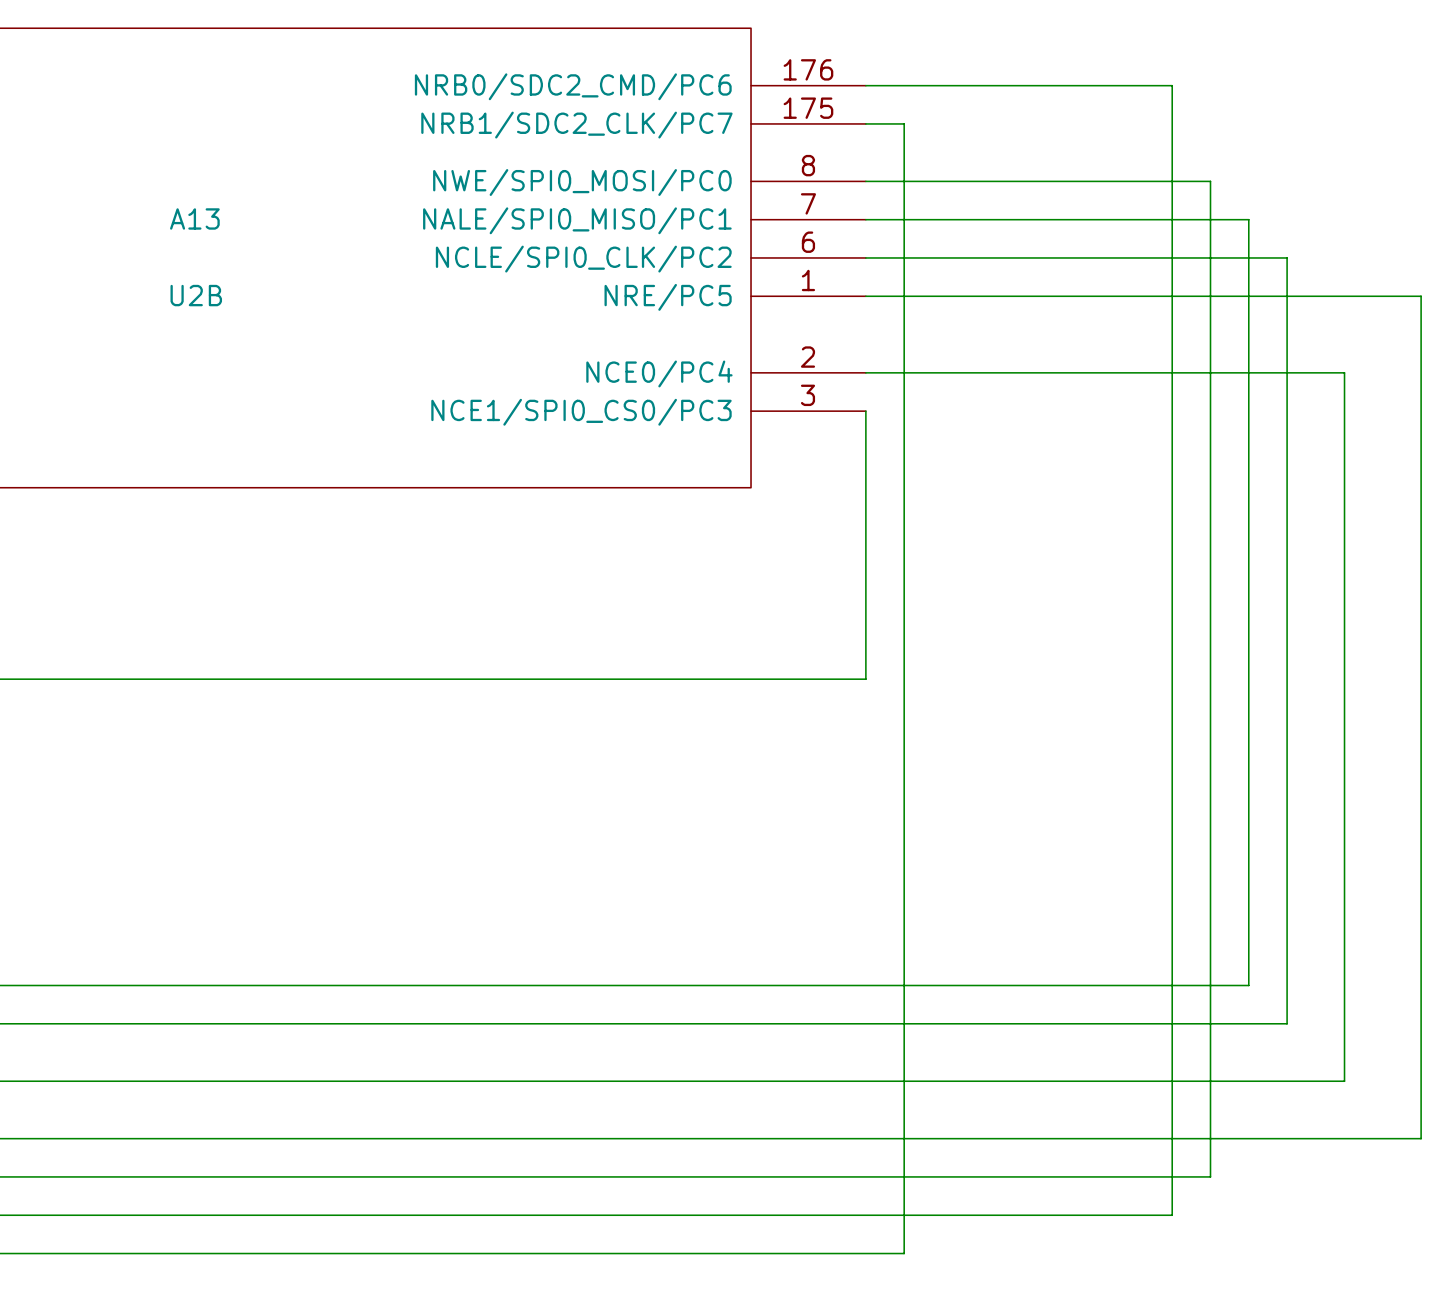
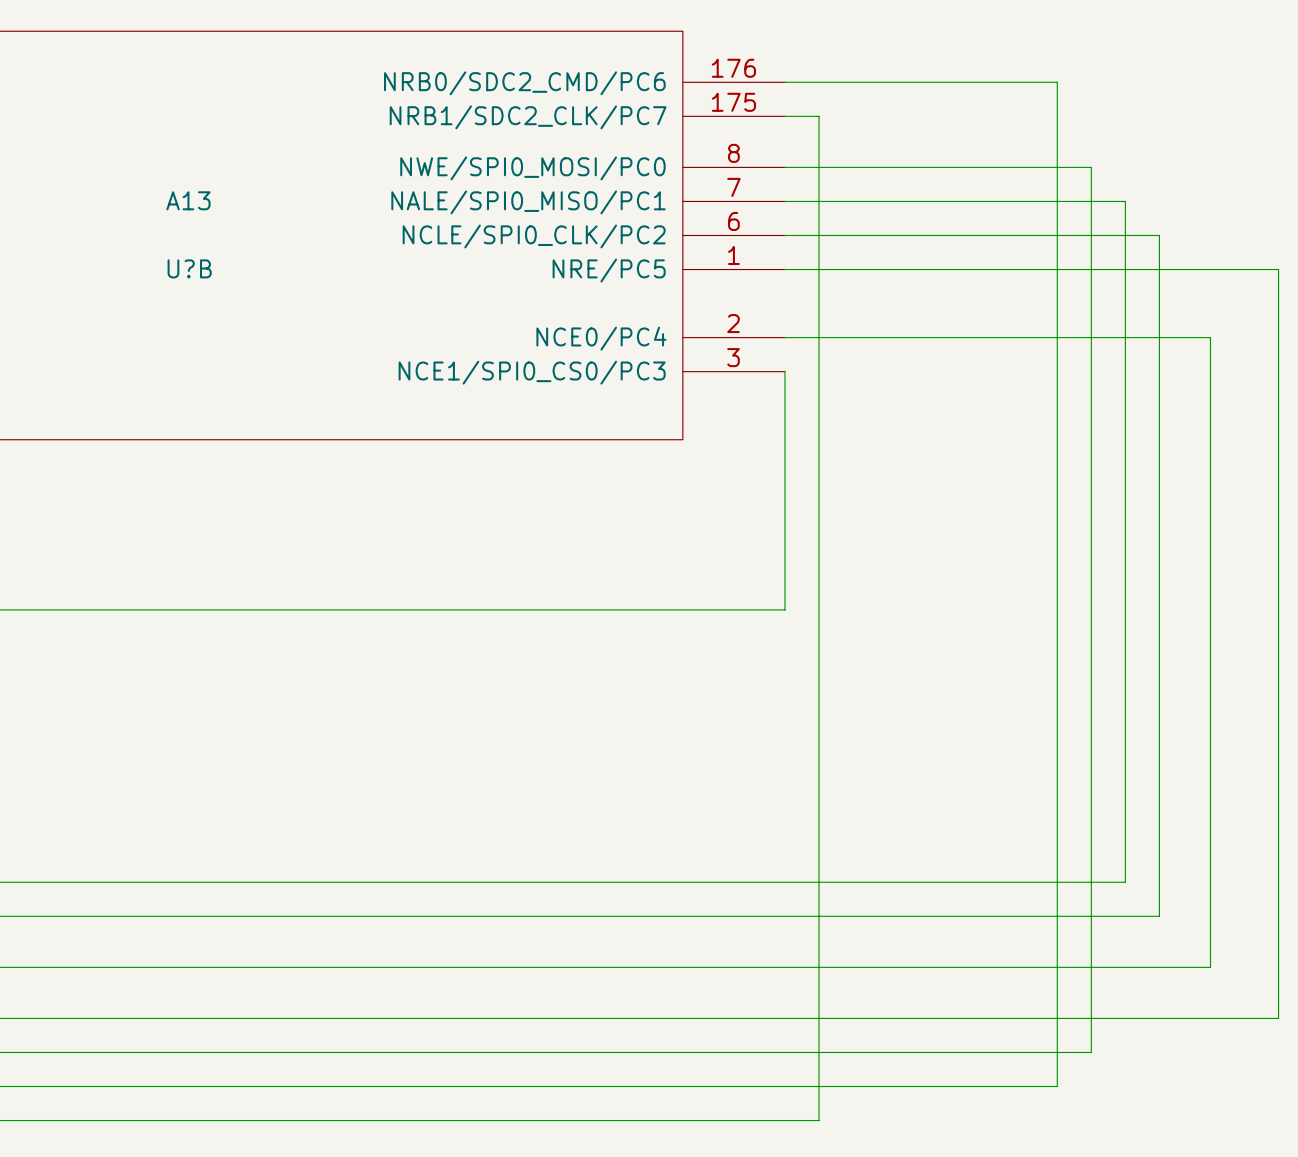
U2B name: U2B (196, 295) -> U?B (189, 268)

